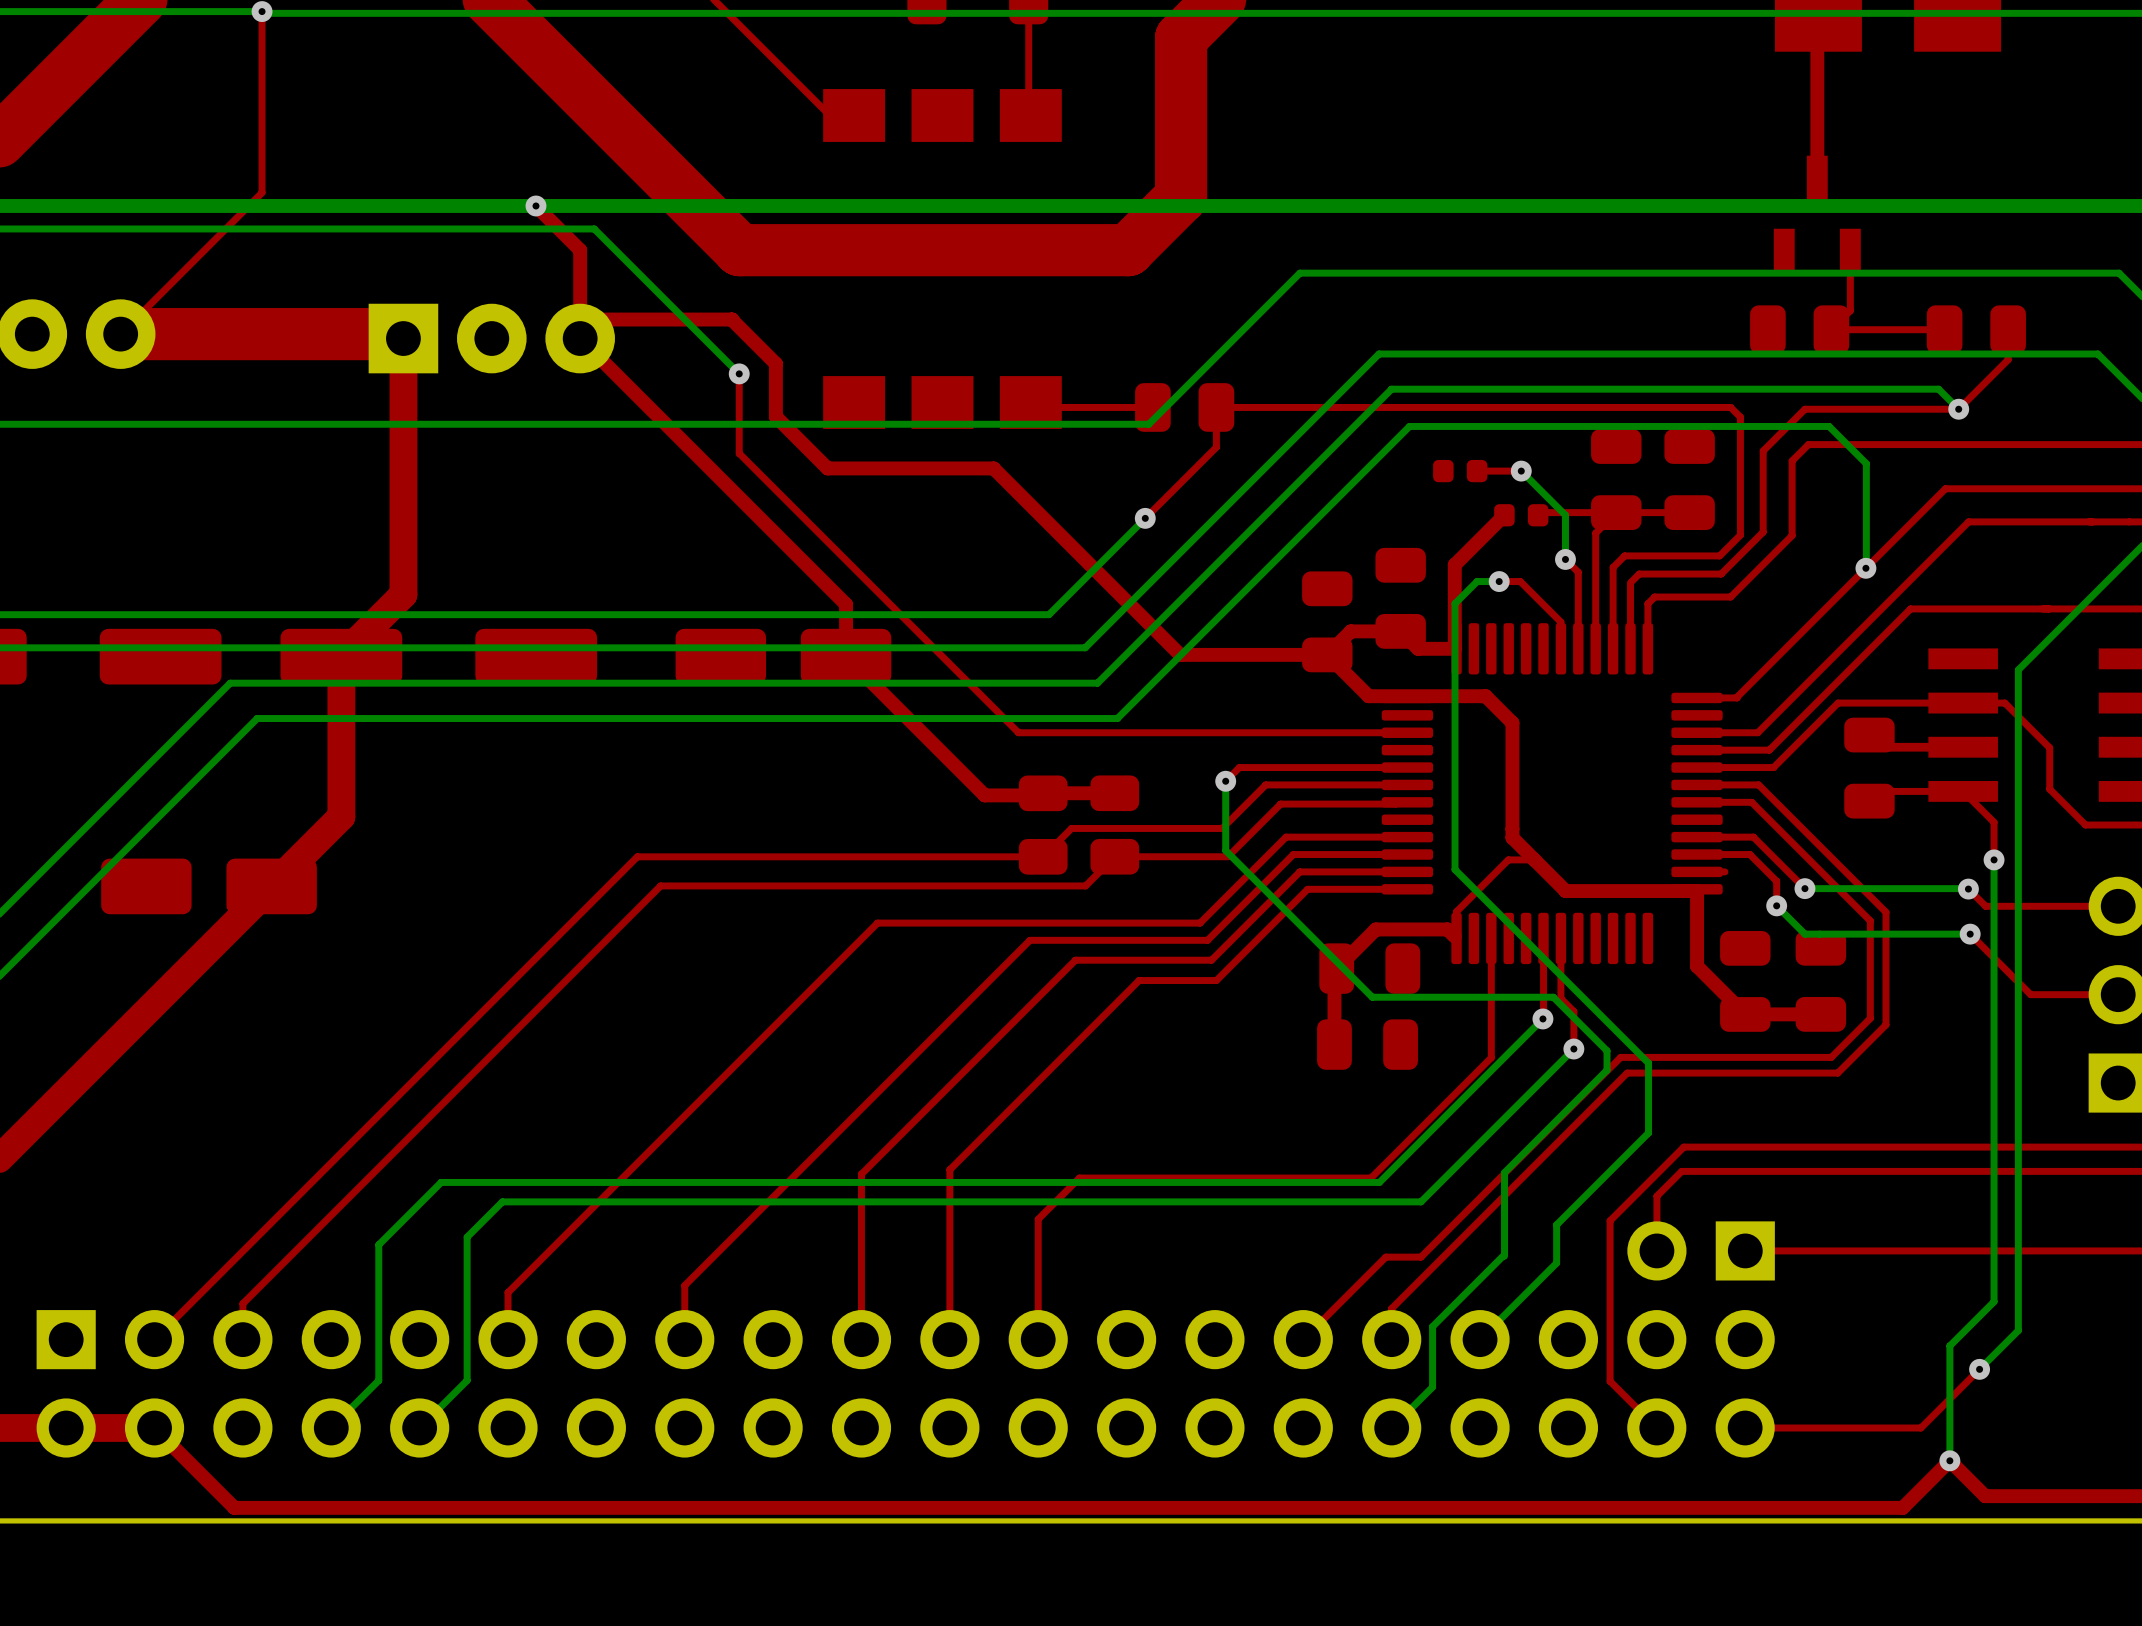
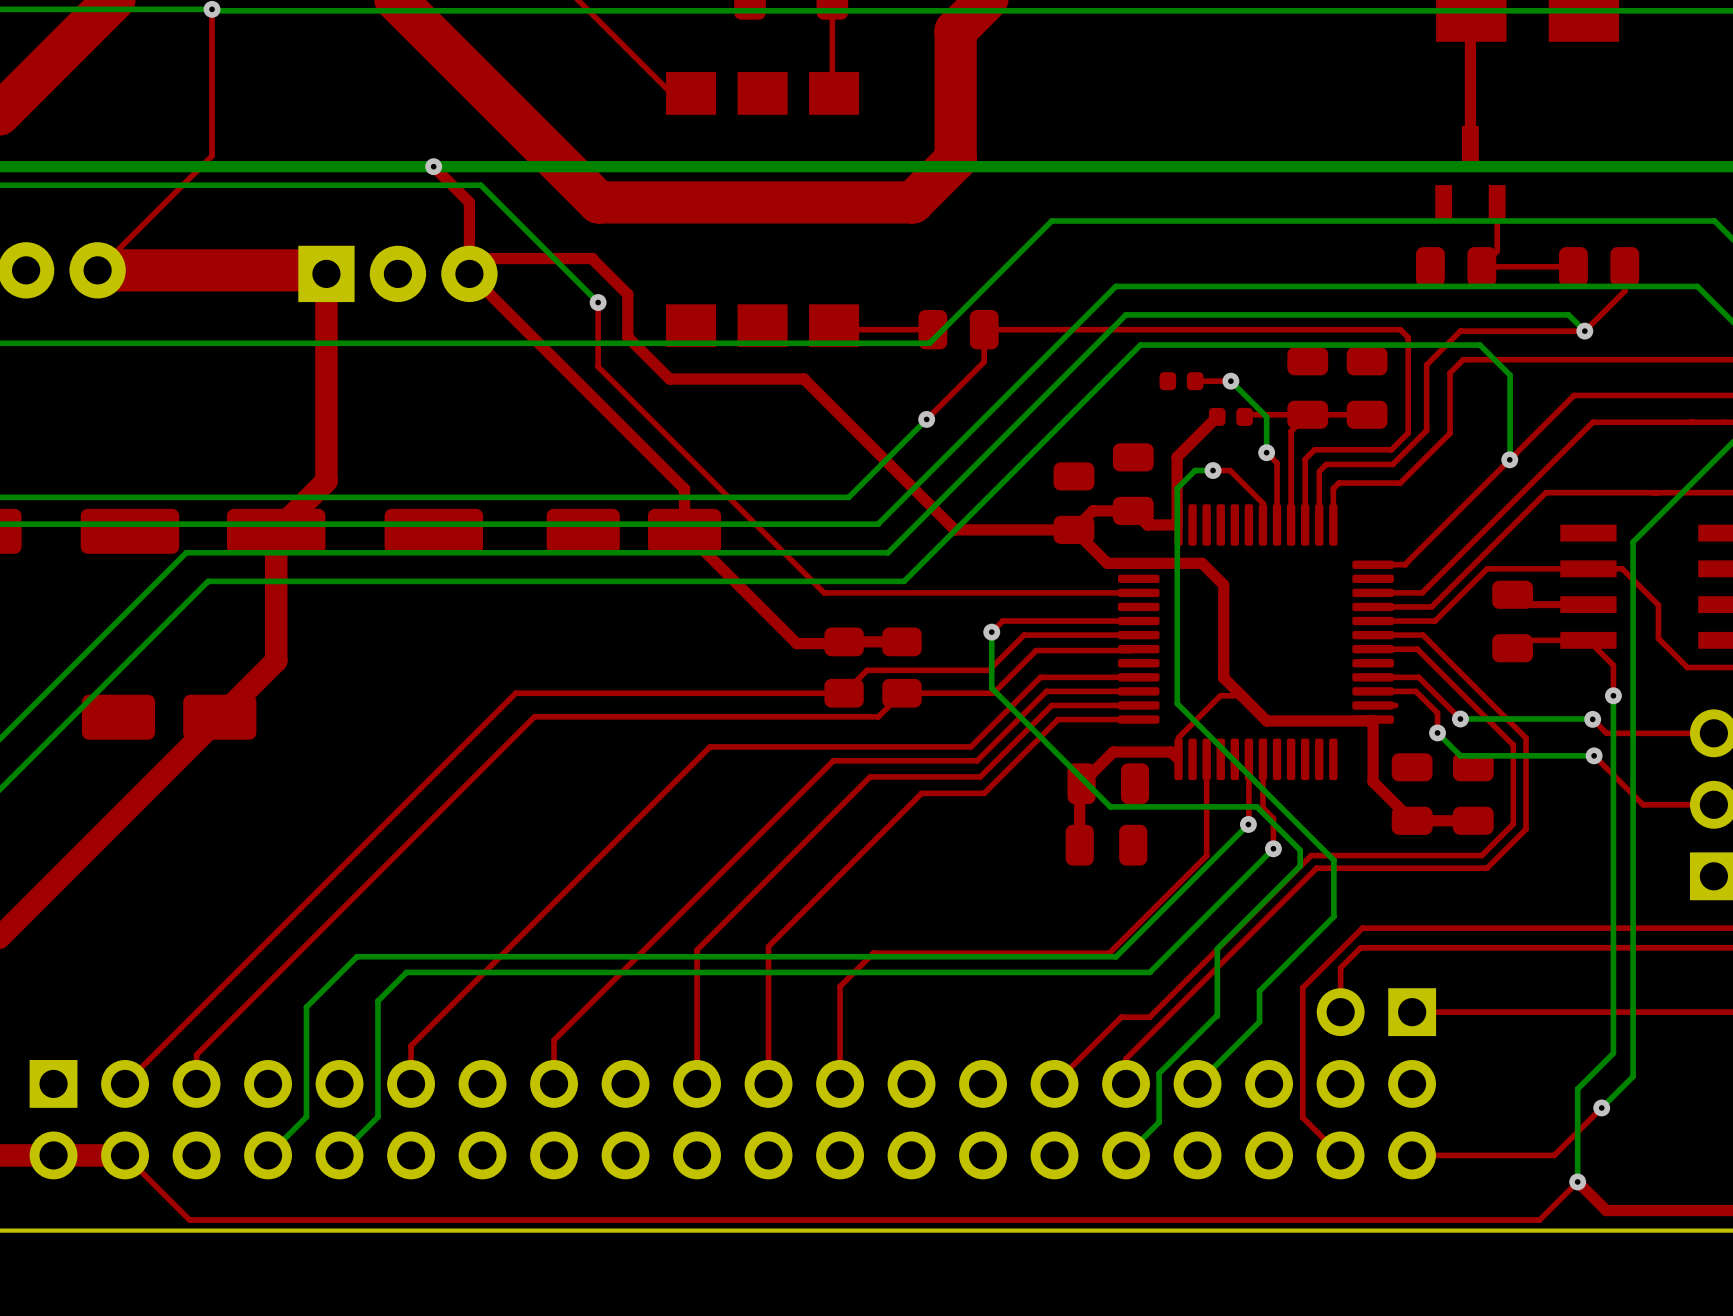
top track width: thick (154, 1428) (234, 1507) (1902, 1507) (1949, 1460) -> thin (125, 1155) (189, 1220) (1539, 1220) (1577, 1181)

